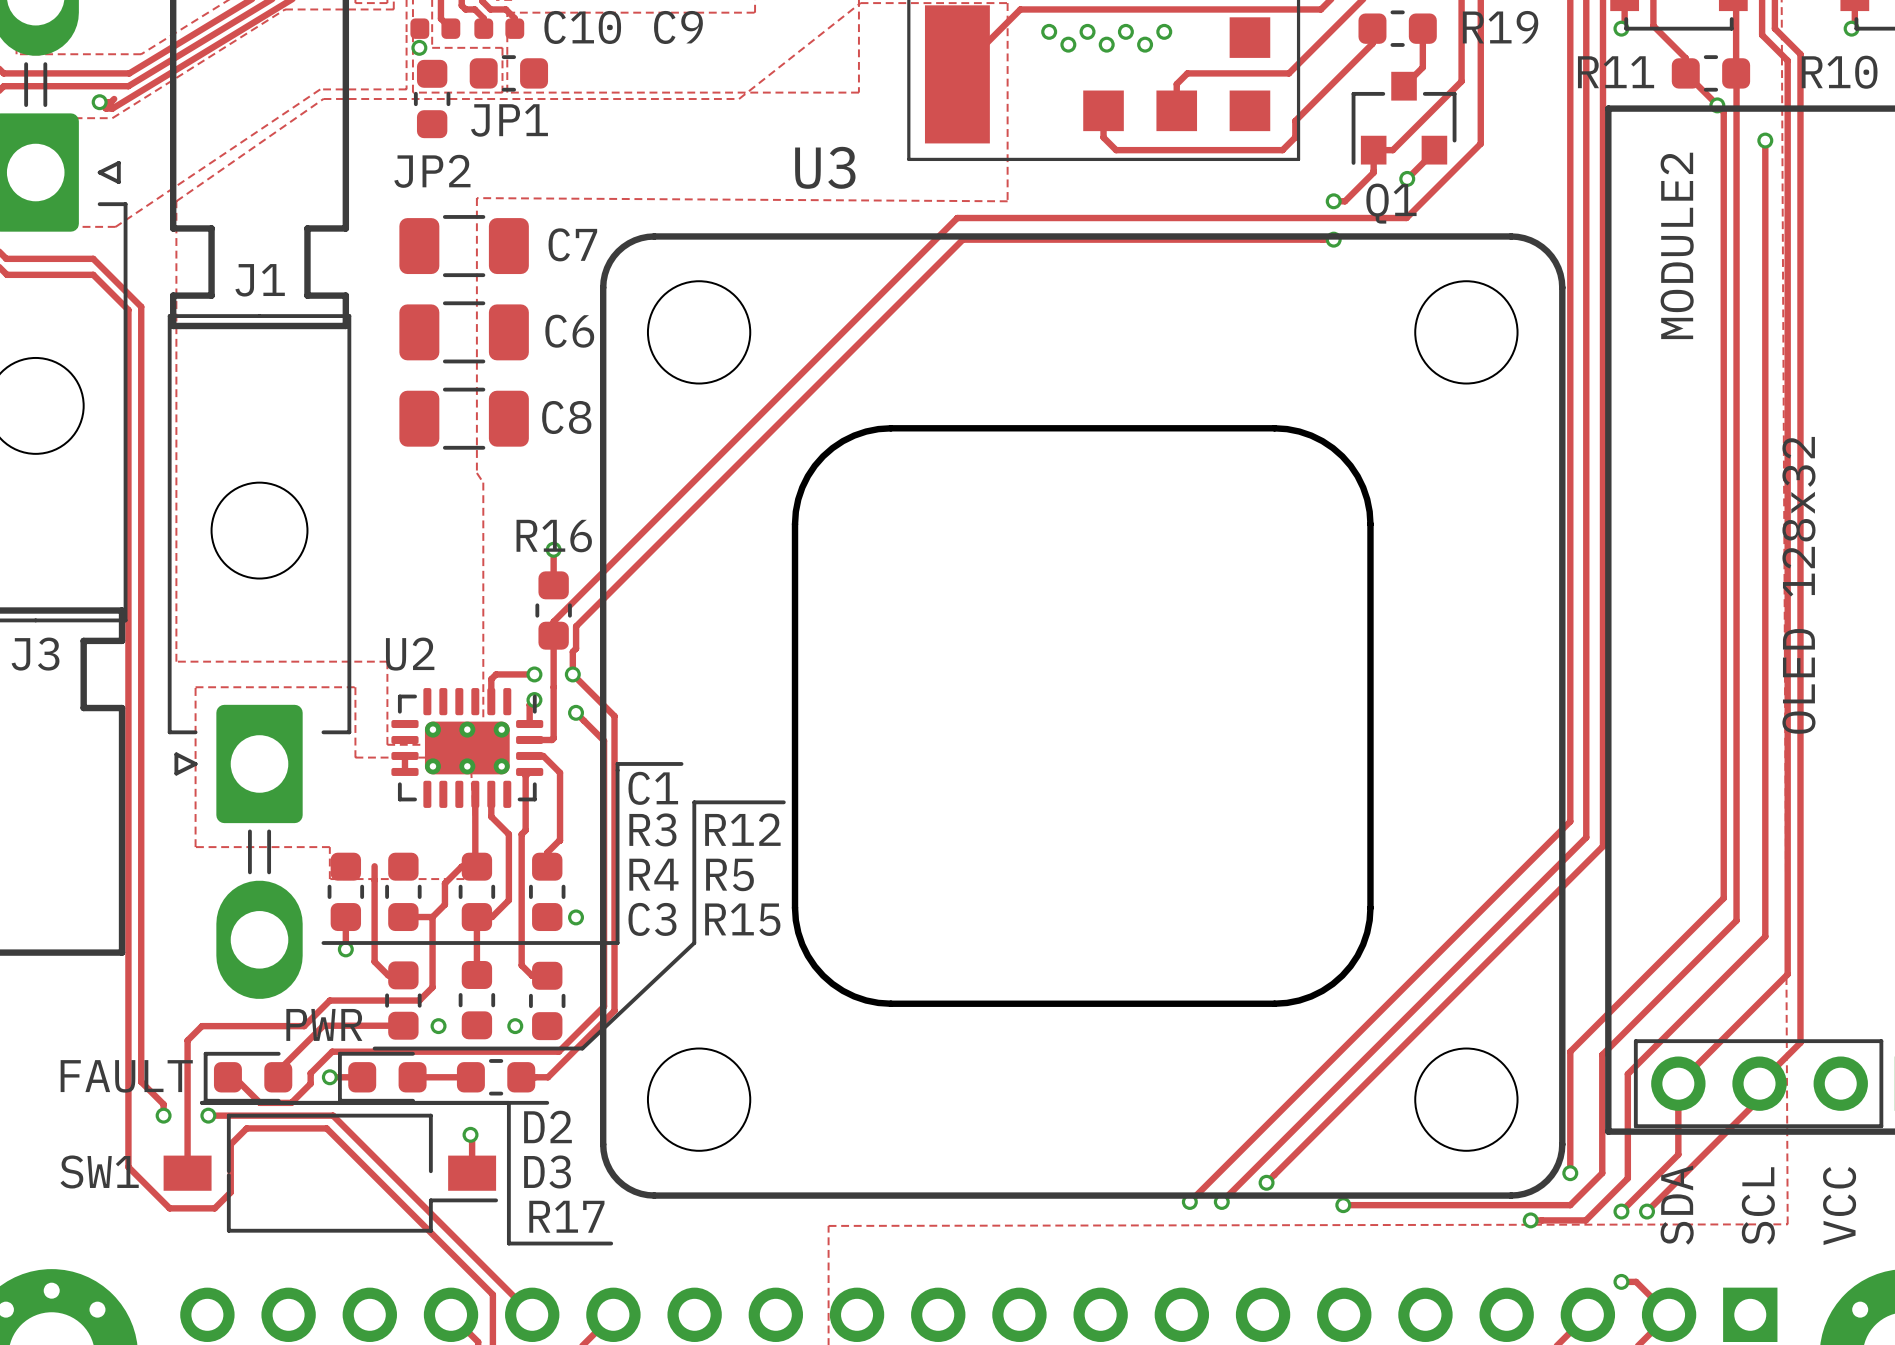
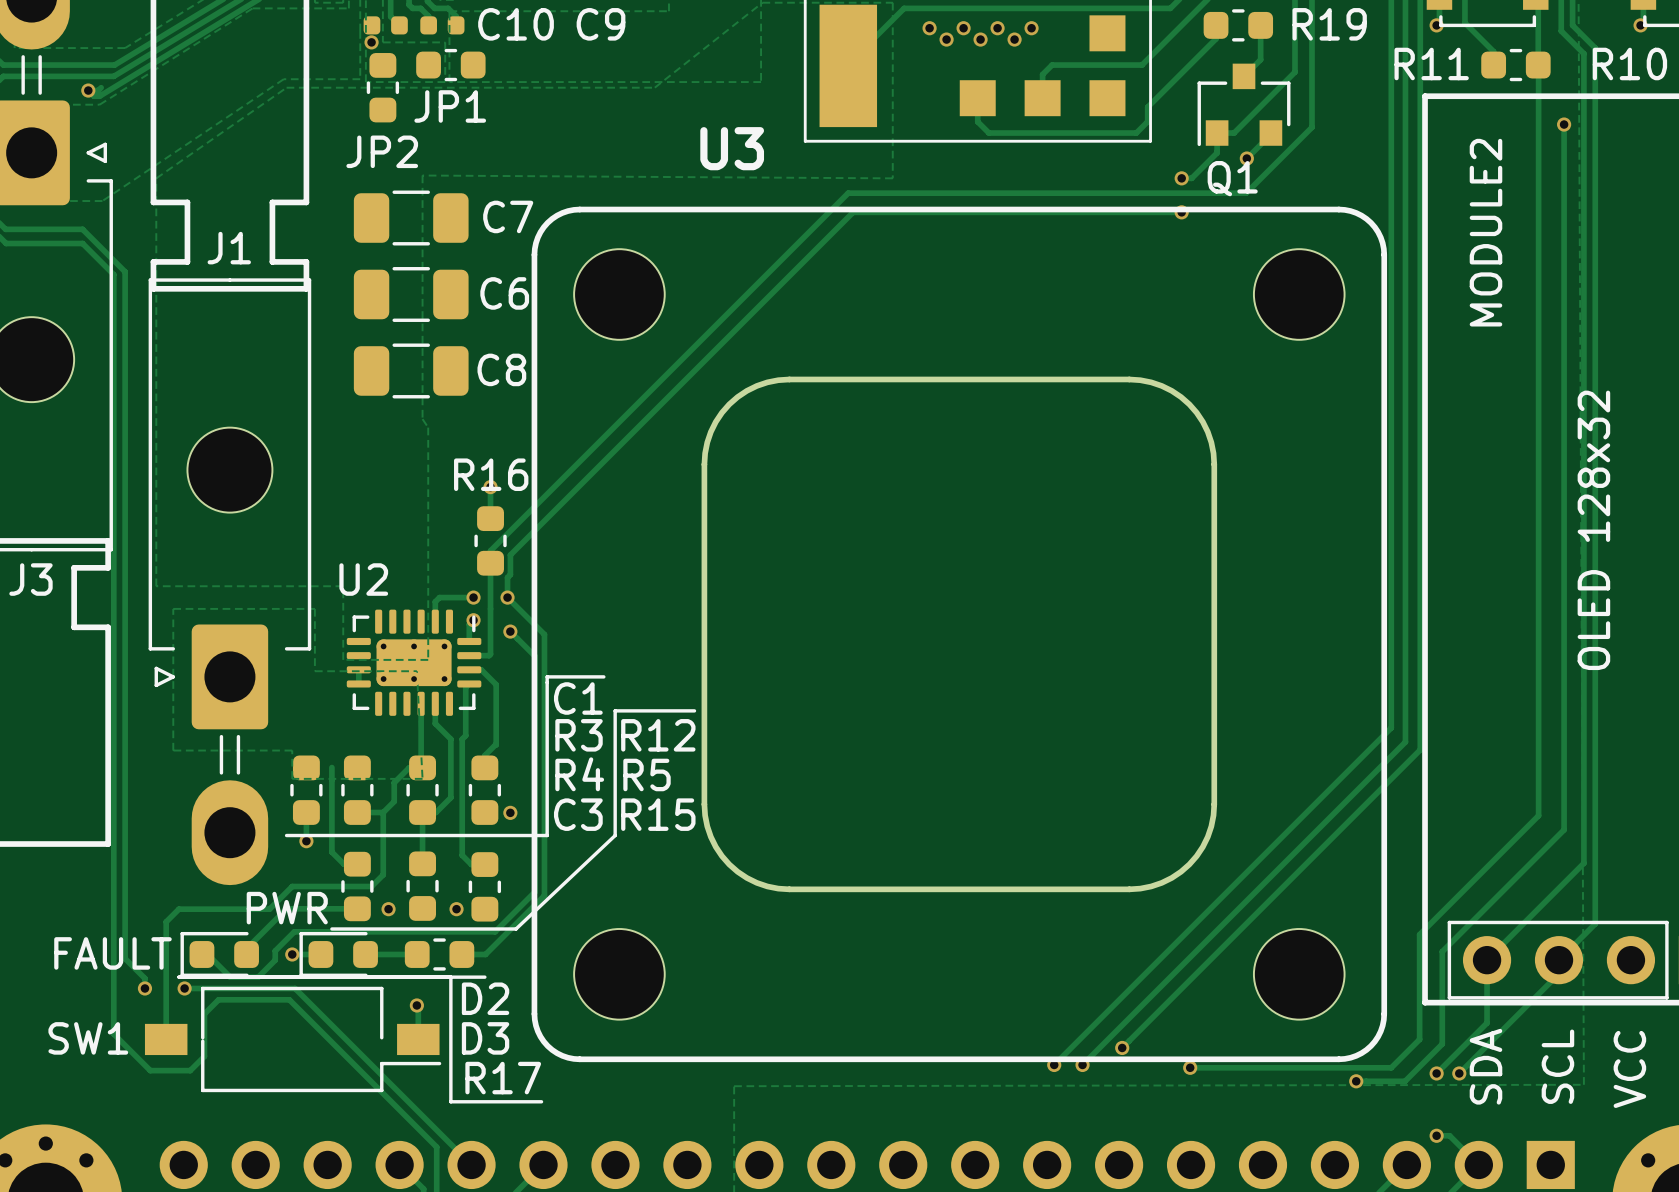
track: (1685, 73) (1723, 111) (1723, 898) (1570, 1051) (1570, 1173) -> none
via: (1717, 105) -> none
via: (1570, 1173) -> none

